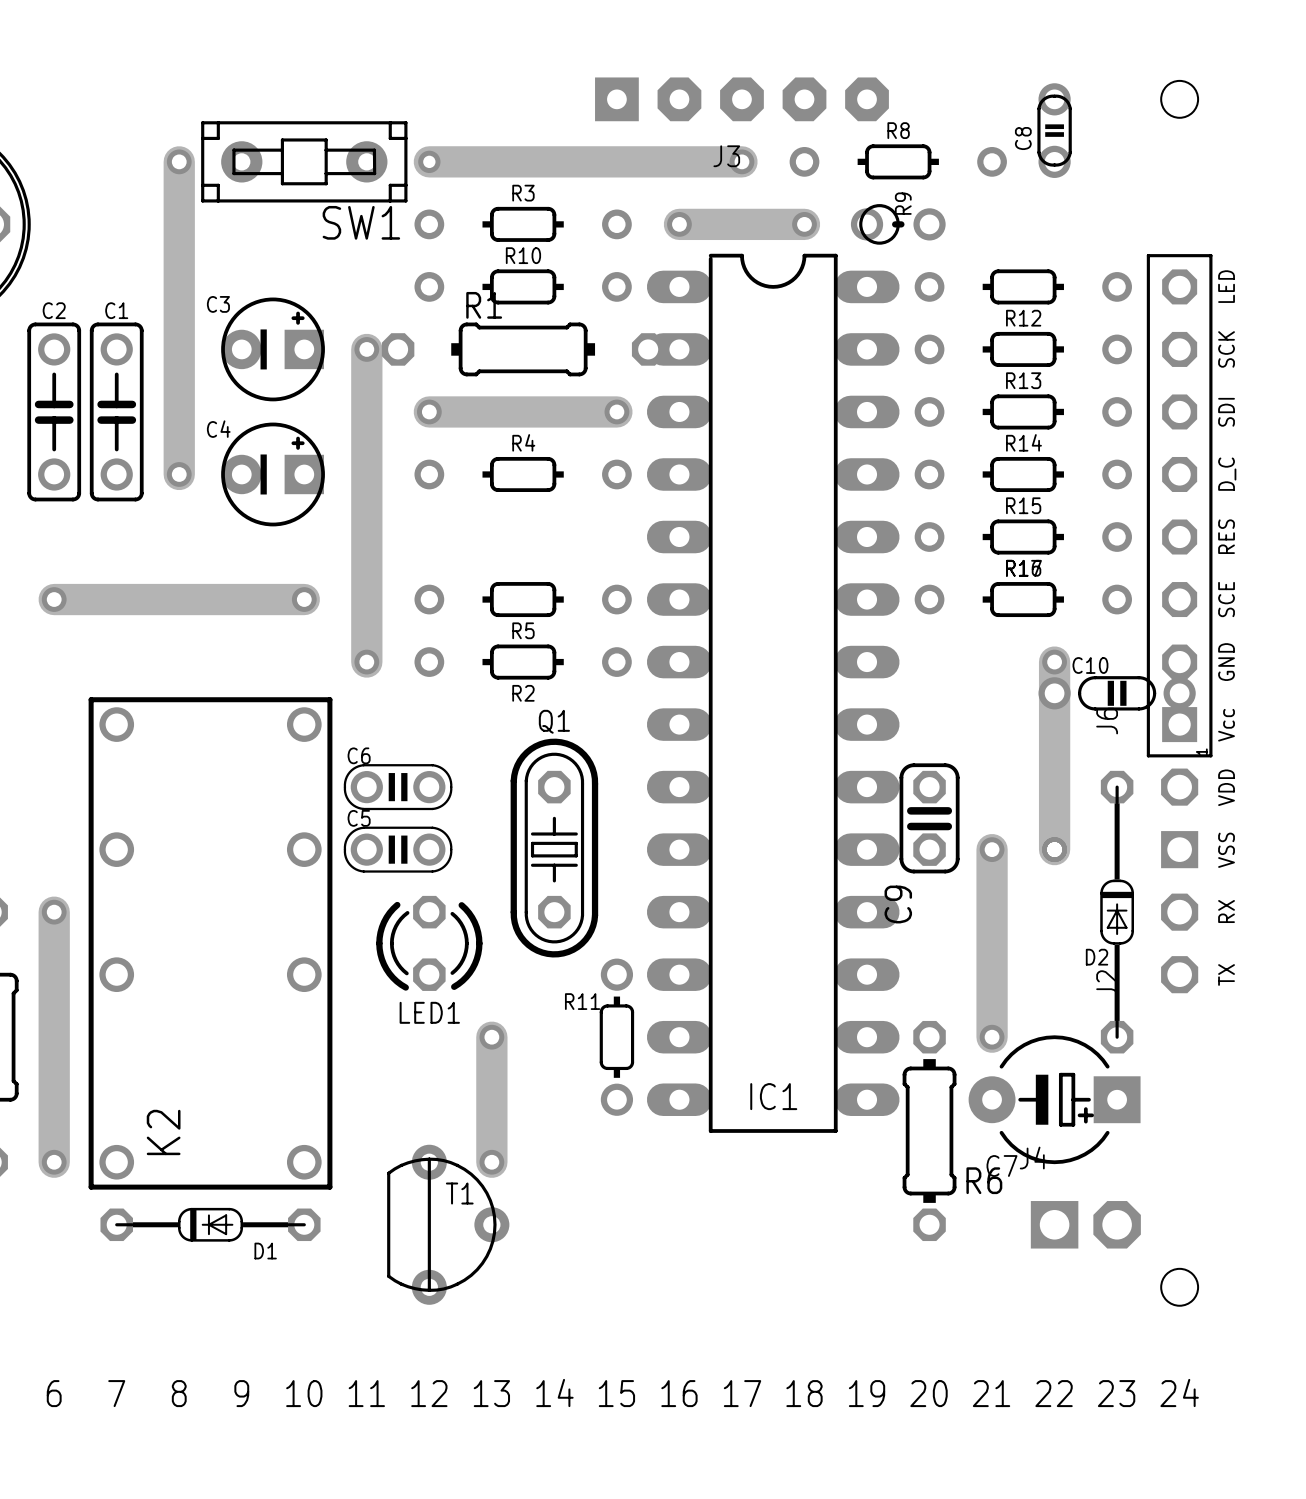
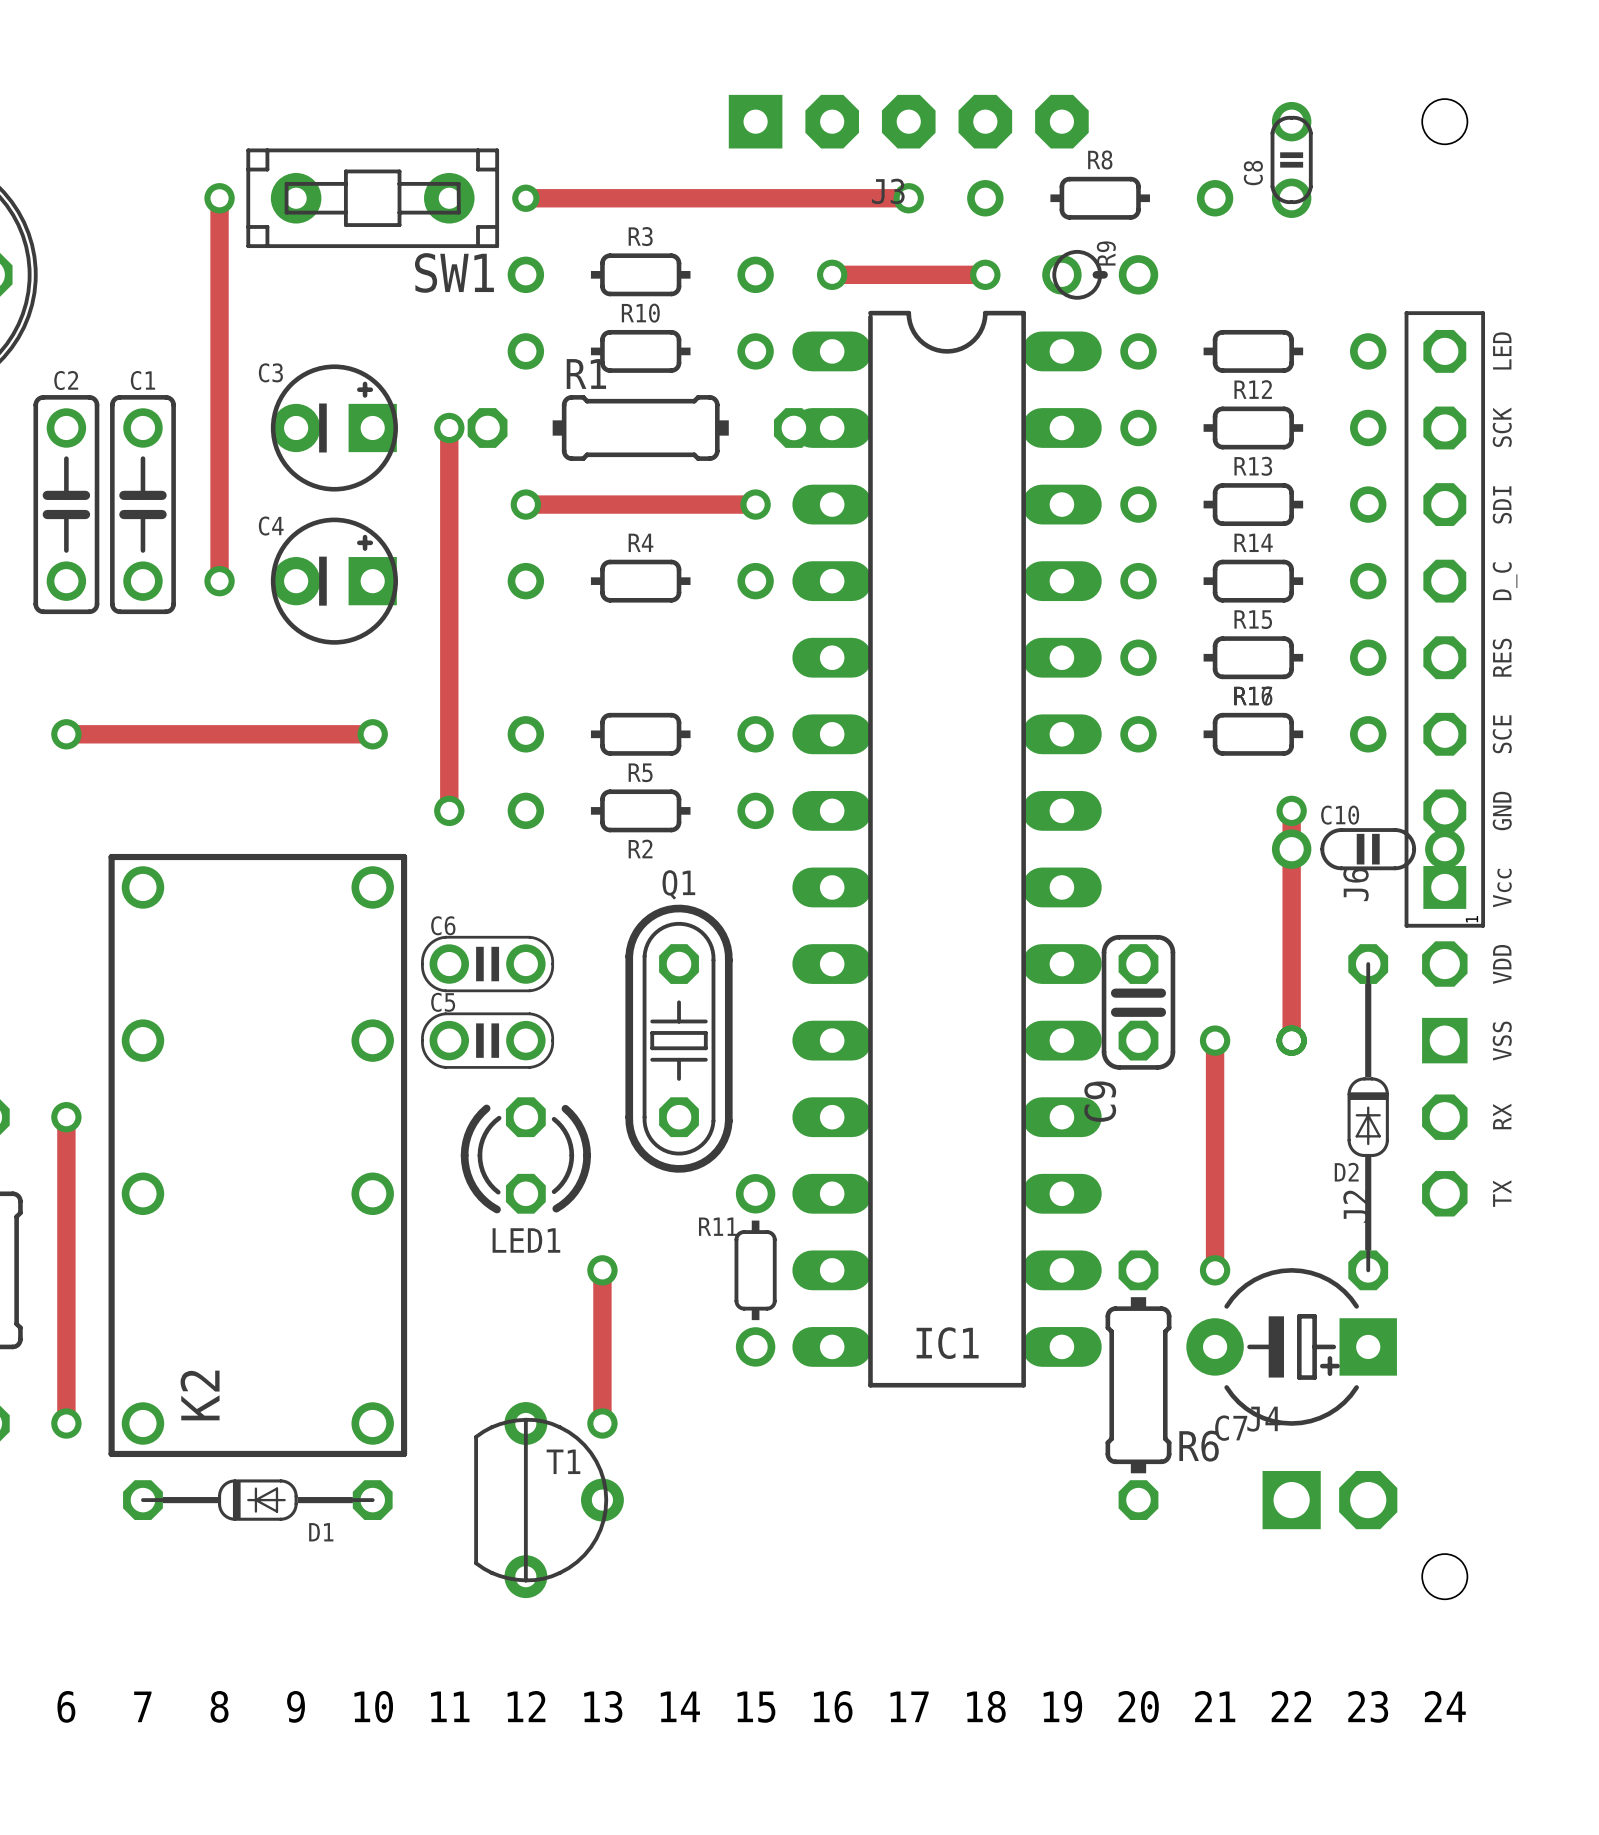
track width: thick (179, 161) (179, 474) -> thin (219, 198) (219, 581)
track width: thick (429, 161) (741, 161) -> thin (525, 198) (908, 198)
track width: thick (679, 224) (804, 224) -> thin (832, 274) (985, 274)
track width: thick (366, 349) (366, 662) -> thin (449, 427) (449, 810)
track width: thick (429, 411) (616, 411) -> thin (525, 504) (755, 504)
track width: thick (54, 599) (304, 599) -> thin (66, 734) (372, 734)
track width: thick (1054, 662) (1054, 849) -> thin (1291, 810) (1291, 1040)
track width: thick (992, 849) (992, 1037) -> thin (1215, 1040) (1215, 1270)
track width: thick (54, 912) (54, 1162) -> thin (66, 1117) (66, 1423)
track width: thick (491, 1037) (491, 1162) -> thin (602, 1270) (602, 1423)

